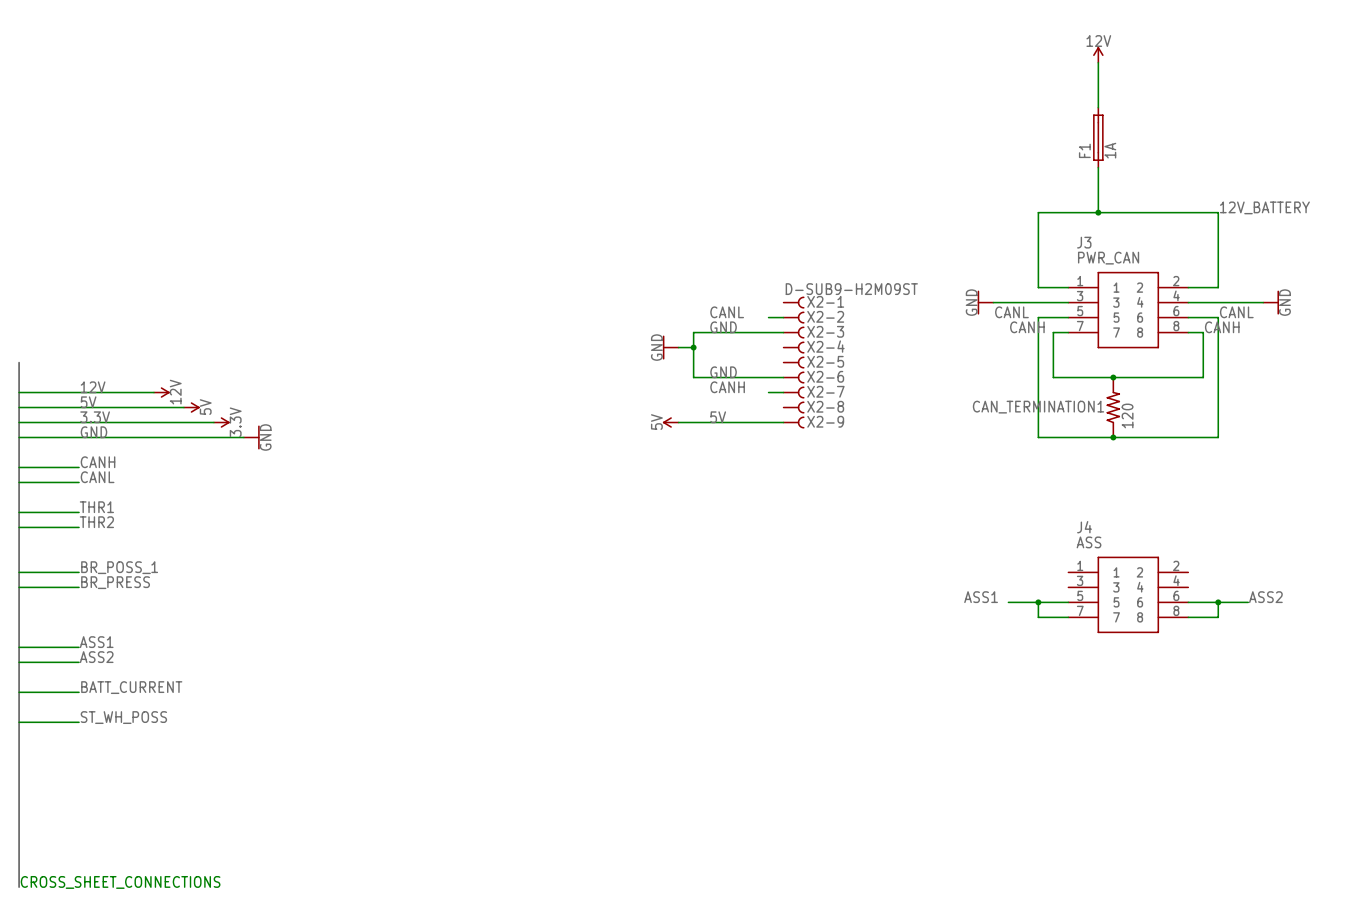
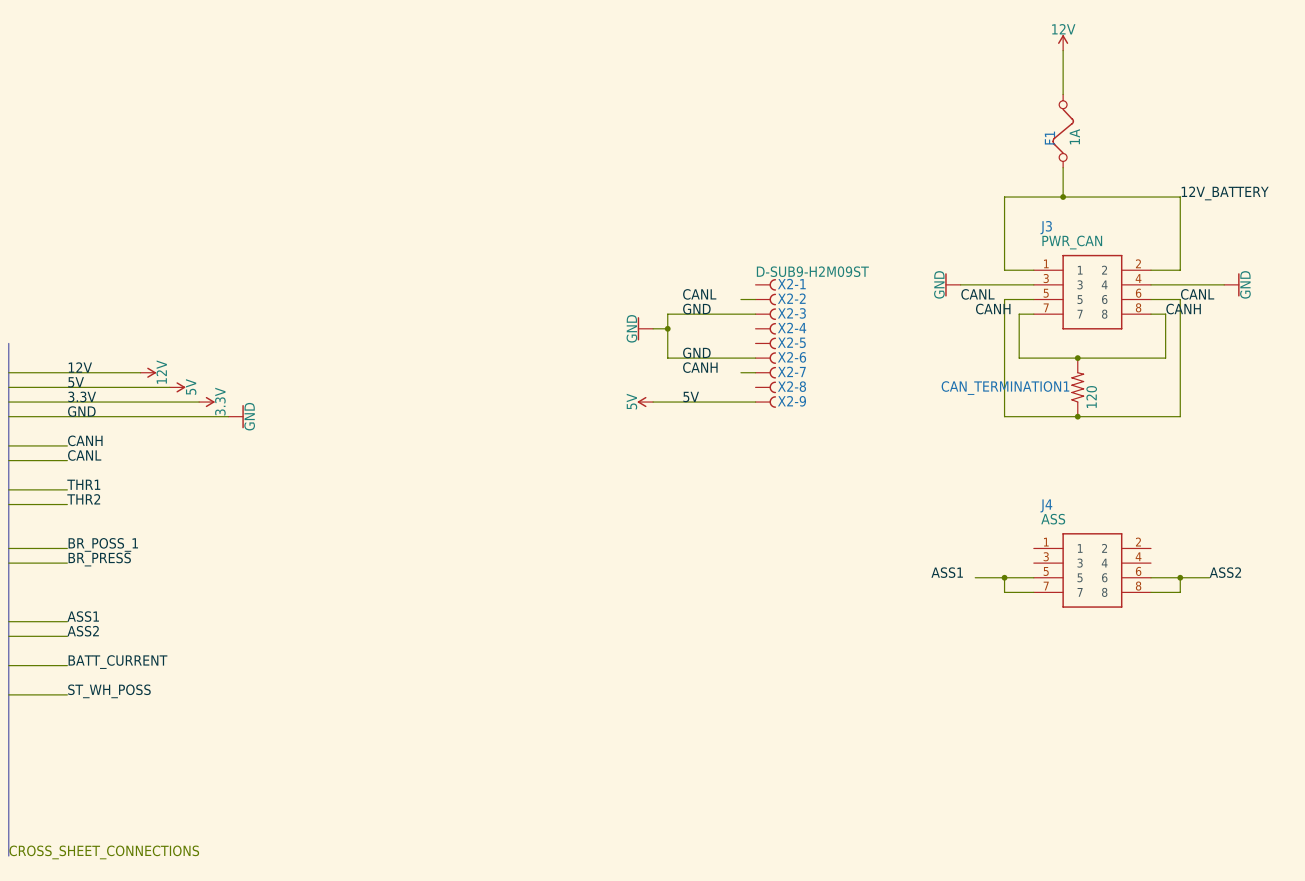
F1 symbol: [1093, 107, 1104, 168] -> [1052, 94, 1075, 168]

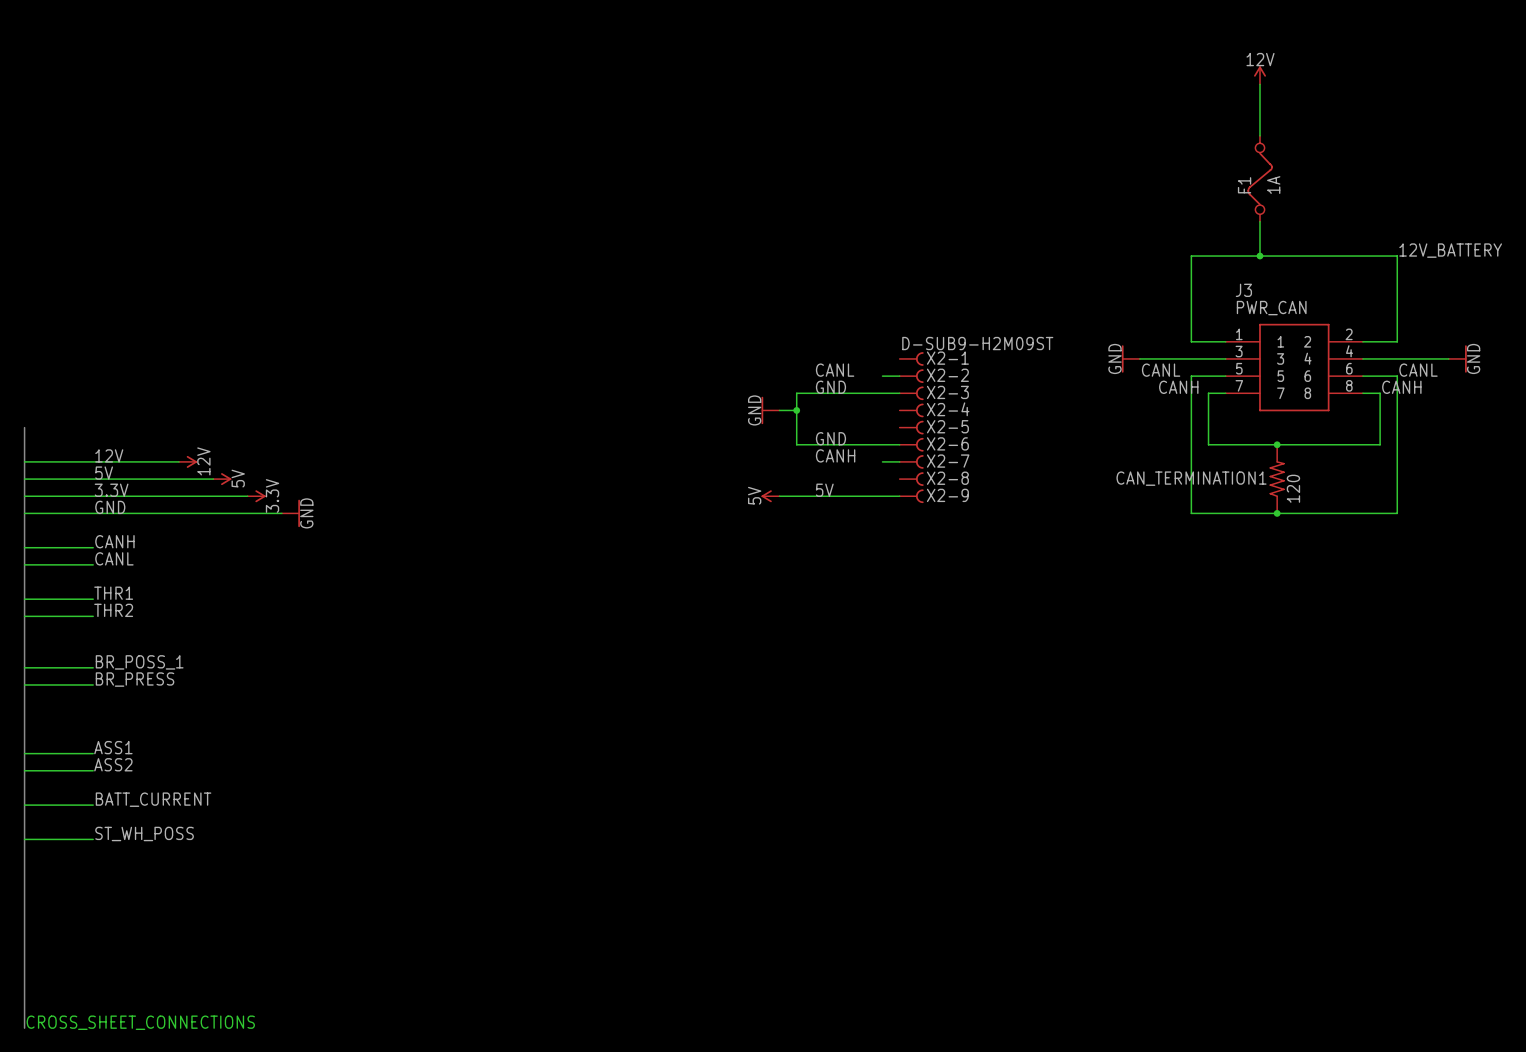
J4: ASS (1092, 570) -> none
label: ASS1 (947, 572) -> none
label: ASS2 (1225, 572) -> none
wire: (975, 577) (1033, 577) -> none
wire: (1004, 577) (1004, 592) (1033, 592) -> none
junction: (1004, 577) -> none
wire: (1150, 577) (1209, 577) -> none
wire: (1180, 577) (1180, 592) (1150, 592) -> none
junction: (1180, 577) -> none

